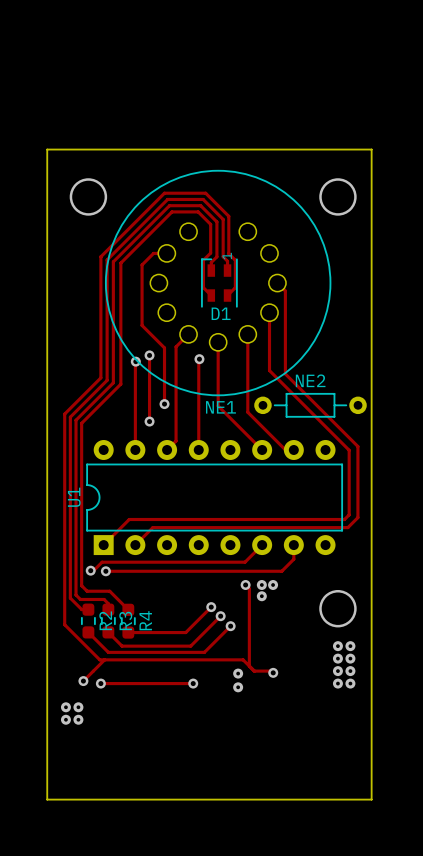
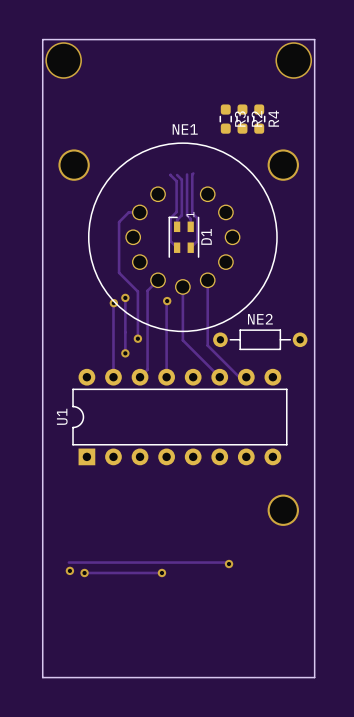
via: none -> (63, 60)
via: none -> (293, 60)
board edge: (47, 149) (47, 799) (371, 799) (371, 149) (47, 149) -> (42, 39) (42, 677) (314, 677) (314, 39) (42, 39)
track: none -> (193, 173) (192, 213)
track: (223, 219) (203, 199) (167, 199) (107, 259) (107, 380) (70, 417) (70, 598) (81, 609) (88, 609) -> (187, 183) (187, 174)
track: (216, 221) (200, 205) (169, 205) (113, 261) (113, 382) (76, 420) (76, 595) (80, 599) (104, 599) (108, 603) (108, 609) -> (181, 186) (181, 179) (177, 175)
track: (210, 224) (198, 211) (172, 211) (120, 263) (120, 384) (81, 423) (81, 585) (87, 591) (109, 591) (128, 609) -> (176, 188) (176, 181) (170, 174)
track: (229, 254) (228, 216) (205, 193) (164, 193) (100, 256) (100, 377) (64, 414) (64, 624) (99, 659) (243, 659) (254, 671) -> (68, 562) (213, 562)
track: (277, 283) (285, 291) (285, 373) (357, 446) (357, 517) (347, 527) (152, 527) (135, 545) -> none
track: (269, 312) (269, 370) (349, 450) (349, 514) (344, 519) (129, 519) (103, 545) -> none
D1 name rotation: 0° (221, 313) -> 90° counterclockwise (206, 236)
D1 name position: D1 (221, 313) -> D1 (206, 236)
NE1 name position: NE1 (220, 407) -> NE1 (185, 129)
track: (262, 545) (245, 562) (102, 562) (93, 570) (90, 570) -> none
track: (293, 545) (293, 559) (281, 571) (105, 571) -> none
via: (90, 570) -> none
via: (105, 571) -> none
track: (245, 585) (249, 588) (249, 666) -> none
via: (245, 585) -> none
via: (261, 585) -> none
via: (273, 585) -> none
via: (261, 596) -> none
track: (211, 607) (185, 632) (128, 632) -> none
via: (211, 607) -> none
track: (220, 616) (190, 646) (122, 646) (108, 632) -> none
via: (220, 616) -> none
R2 position: (88, 621) -> (242, 119)
R3 position: (108, 621) -> (225, 119)
R4 position: (128, 621) -> (259, 119)
track: (230, 626) (204, 652) (108, 652) (88, 632) -> none
via: (230, 626) -> none
via: (337, 646) -> none
via: (350, 646) -> none
via: (337, 658) -> none
via: (350, 658) -> none
track: (104, 659) (83, 681) -> none
via: (337, 671) -> none
via: (350, 671) -> none
via: (238, 673) -> none
via: (337, 683) -> none
via: (350, 683) -> none
via: (238, 687) -> none
via: (65, 707) -> none
via: (78, 707) -> none
via: (65, 719) -> none
via: (78, 719) -> none

